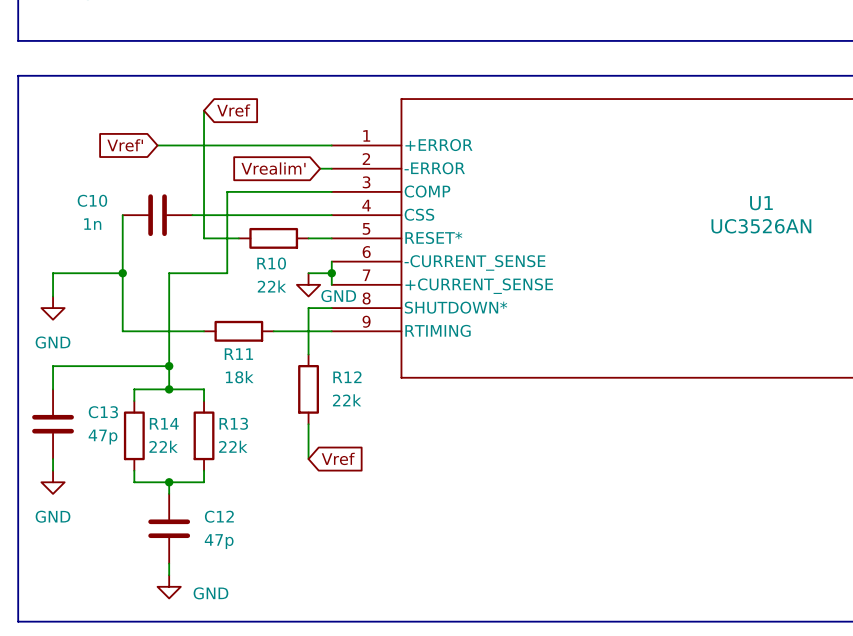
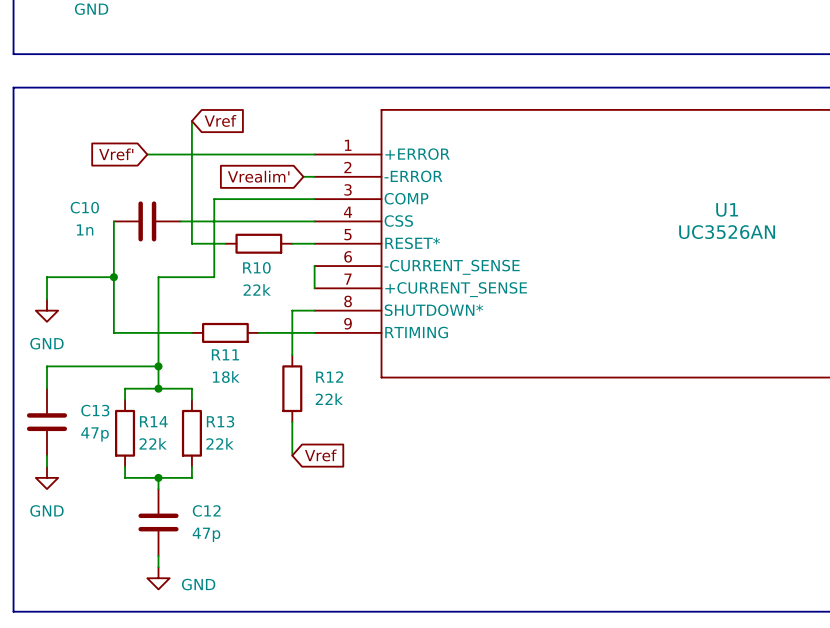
wire: (308, 273) (331, 273) -> none
junction: (331, 273) -> none
power symbol: GND (308, 284) -> none

